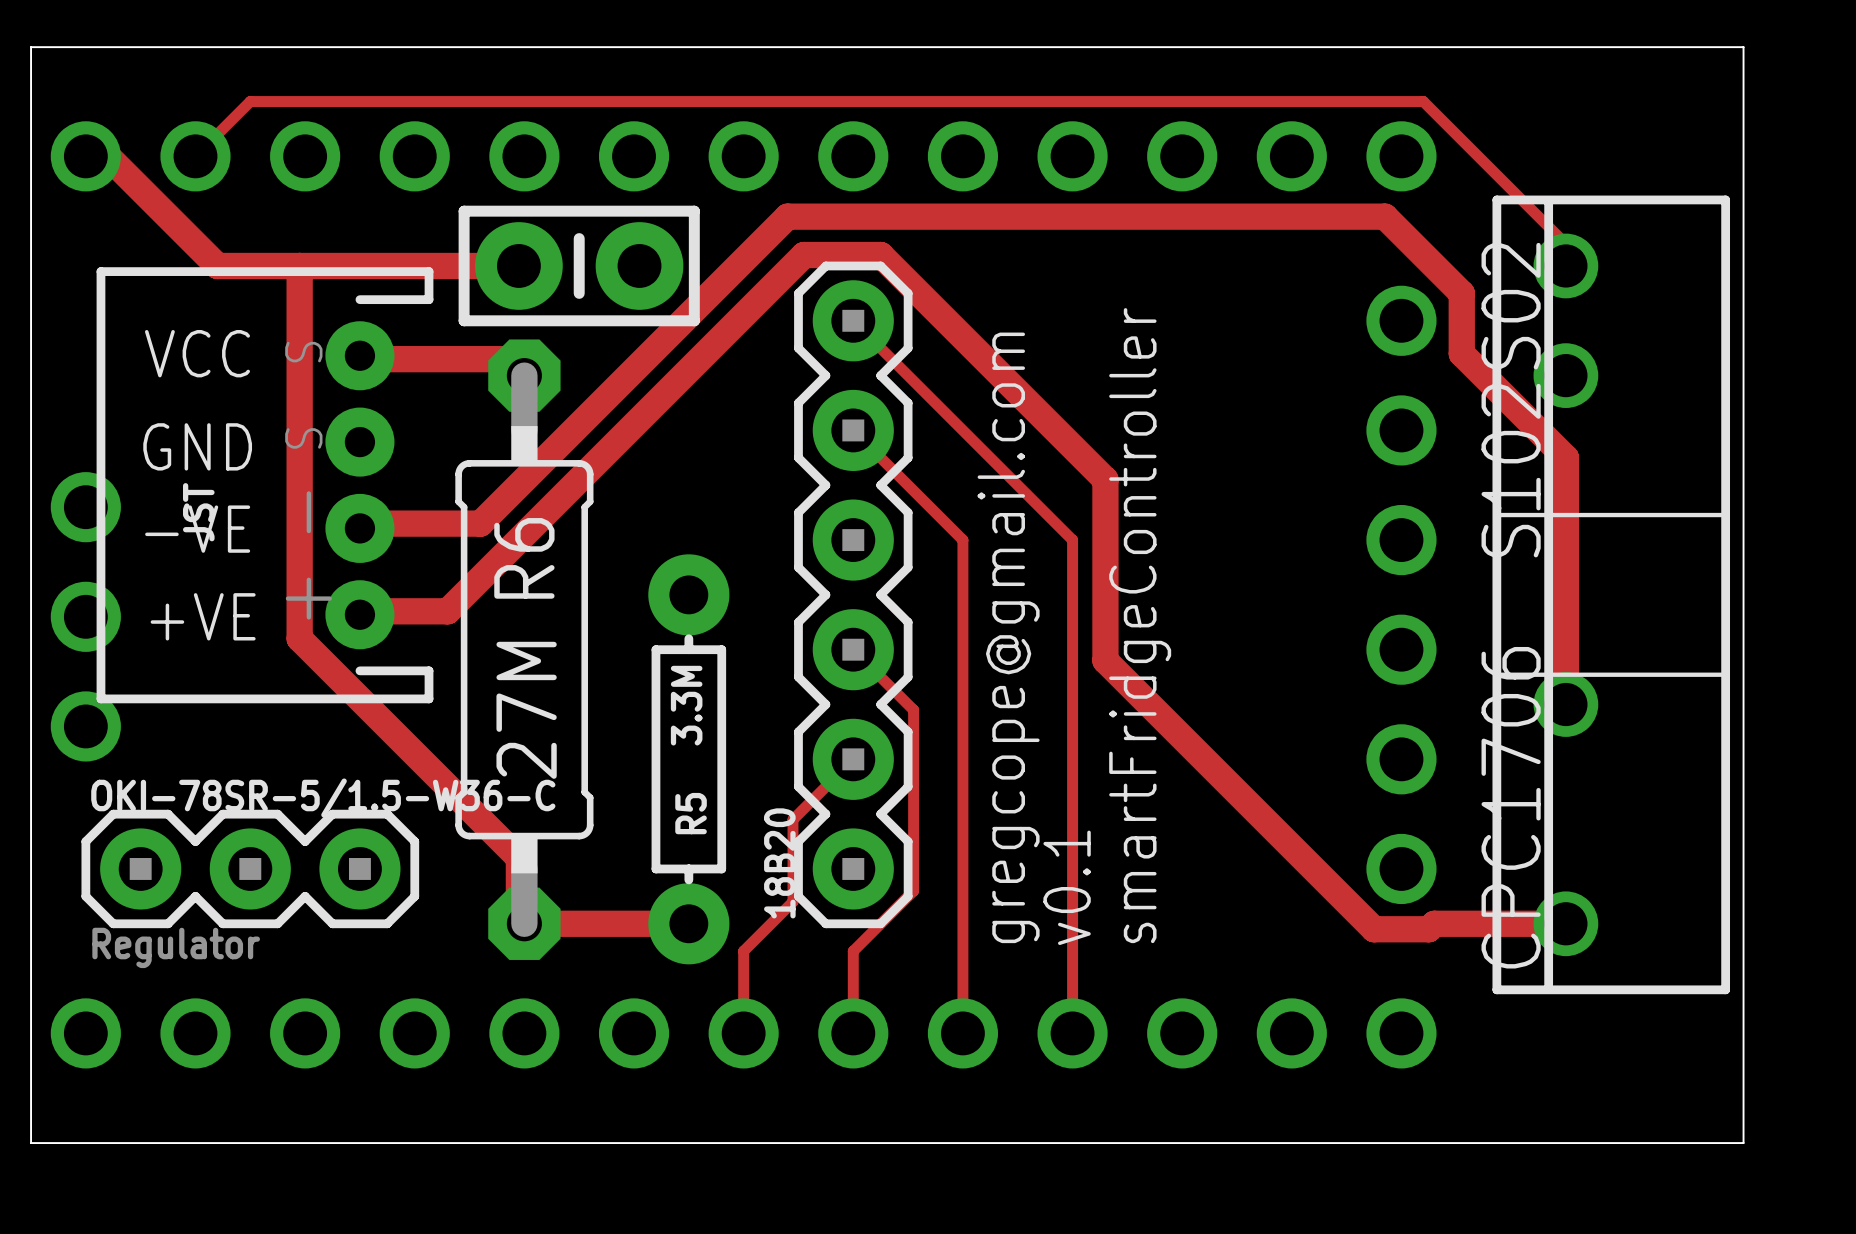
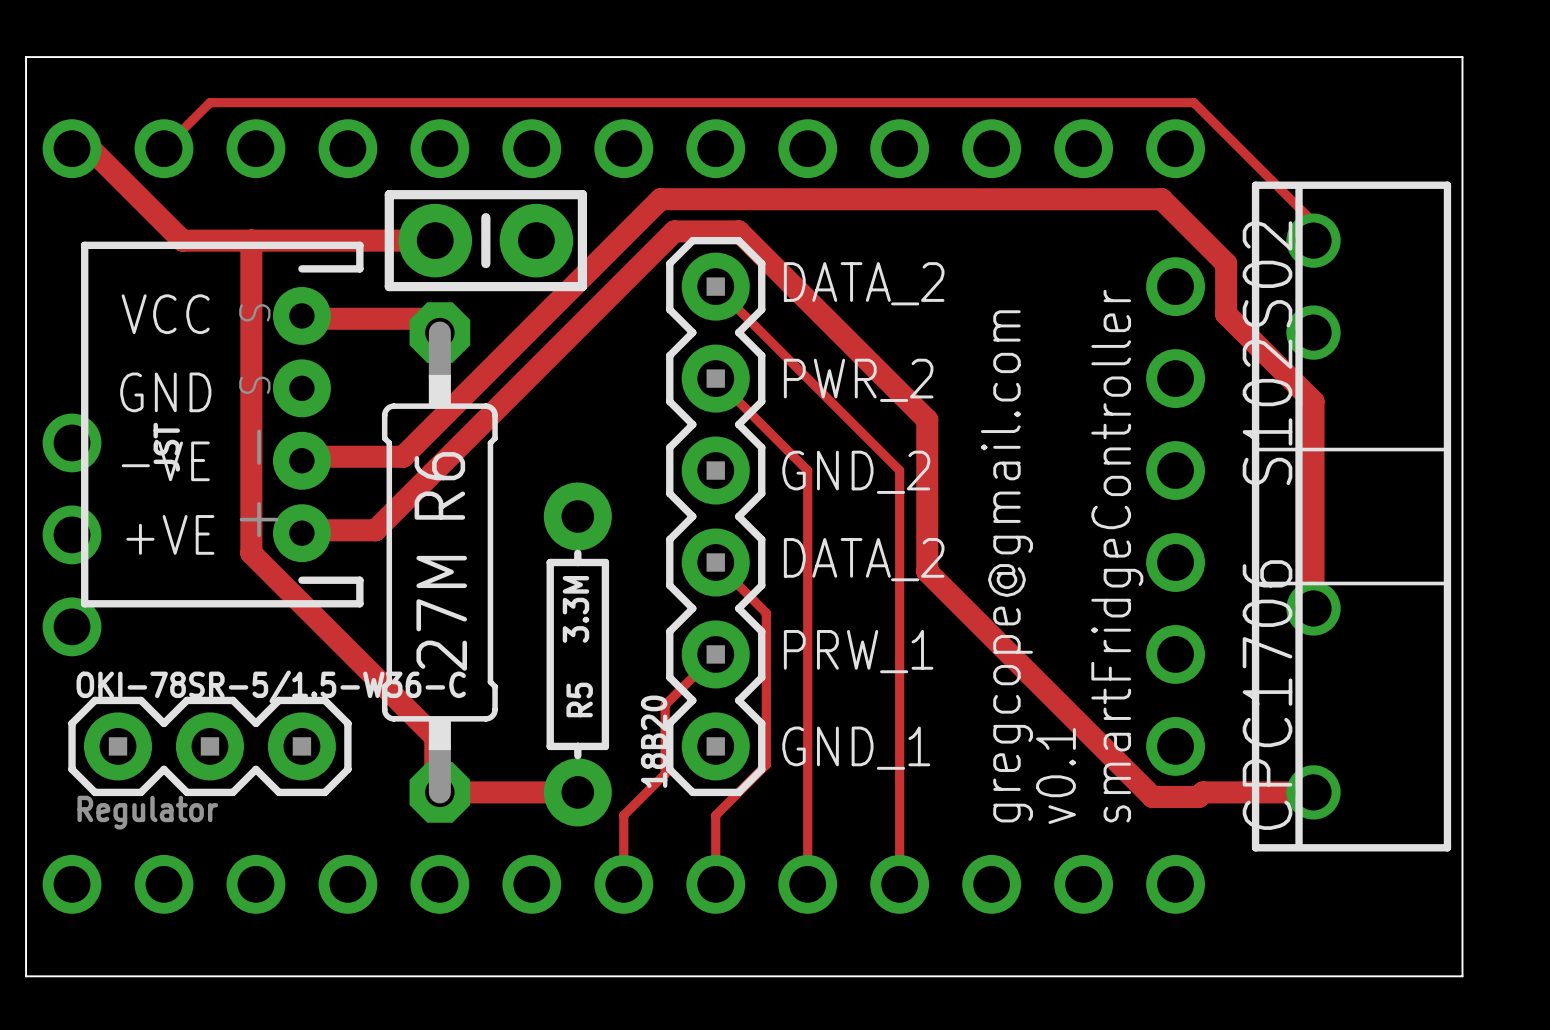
text: none -> DATA_2 (864, 283)
text: none -> PWR_2 (858, 380)
text: none -> GND_2 (856, 472)
text position: smartFridgeController (1140, 625) -> smartFridgeController (1117, 556)
text position: gregcope@gmail.com (1008, 637) -> gregcope@gmail.com (1006, 566)
text: none -> DATA_2 (864, 559)
text: none -> PRW_1 (858, 651)
text: none -> GND_1 (856, 748)
text position: v0.1 (1067, 887) -> v0.1 (1056, 776)

